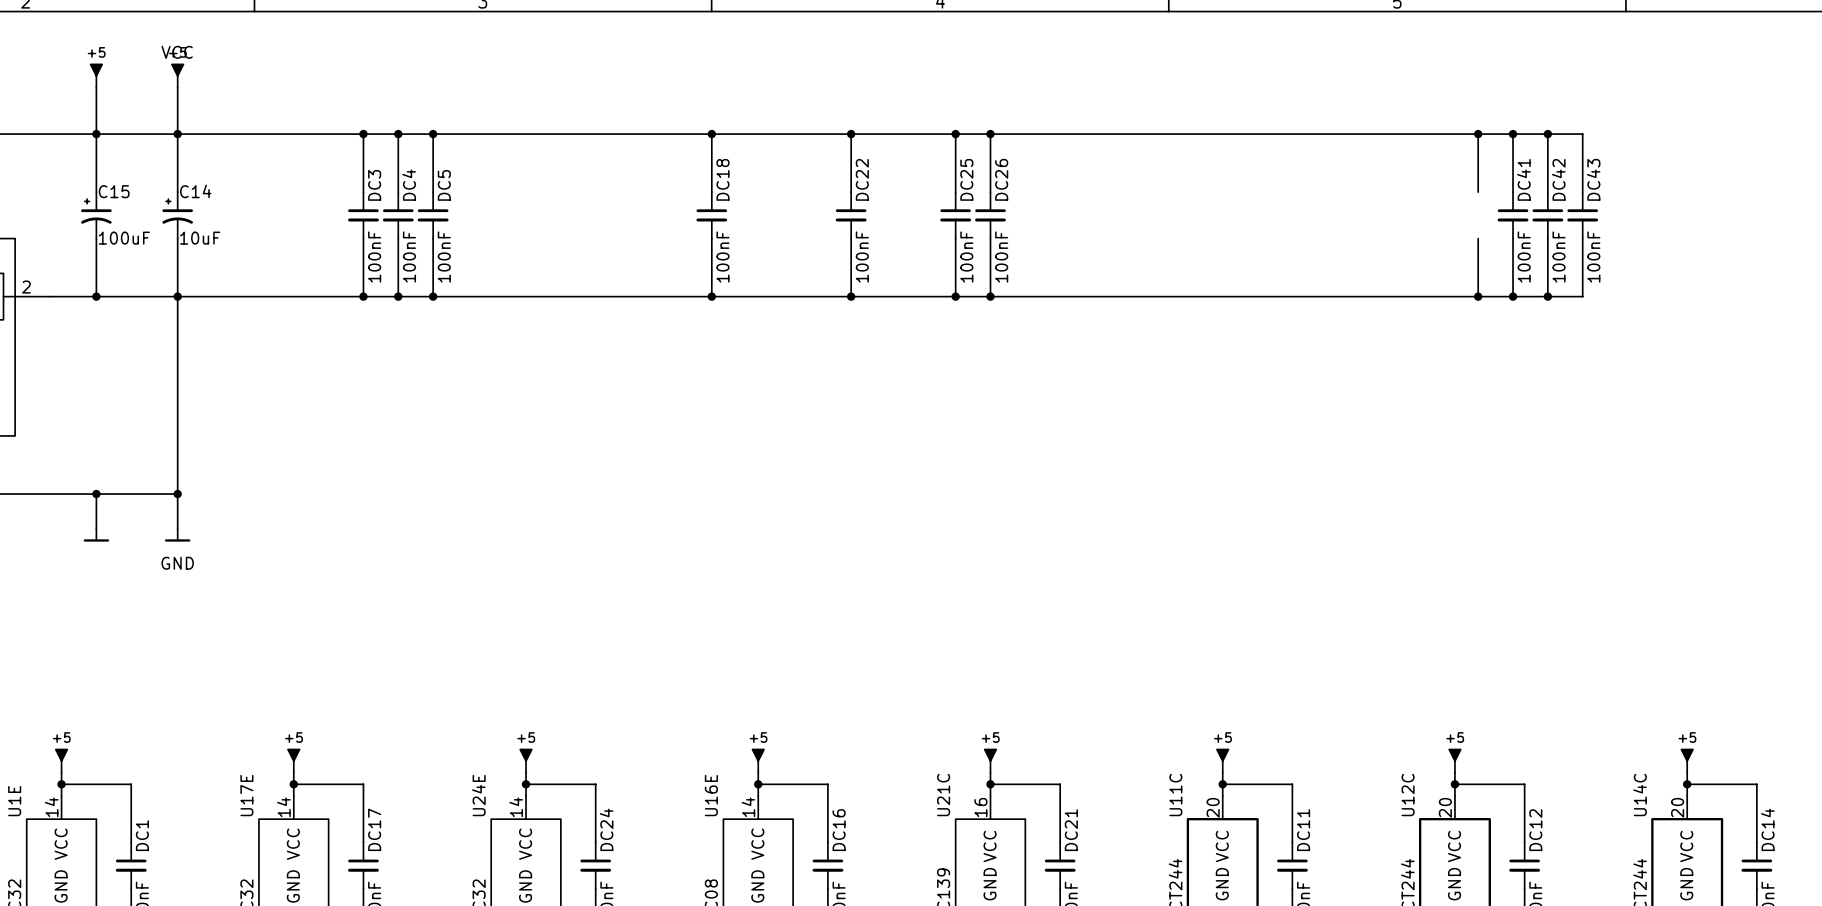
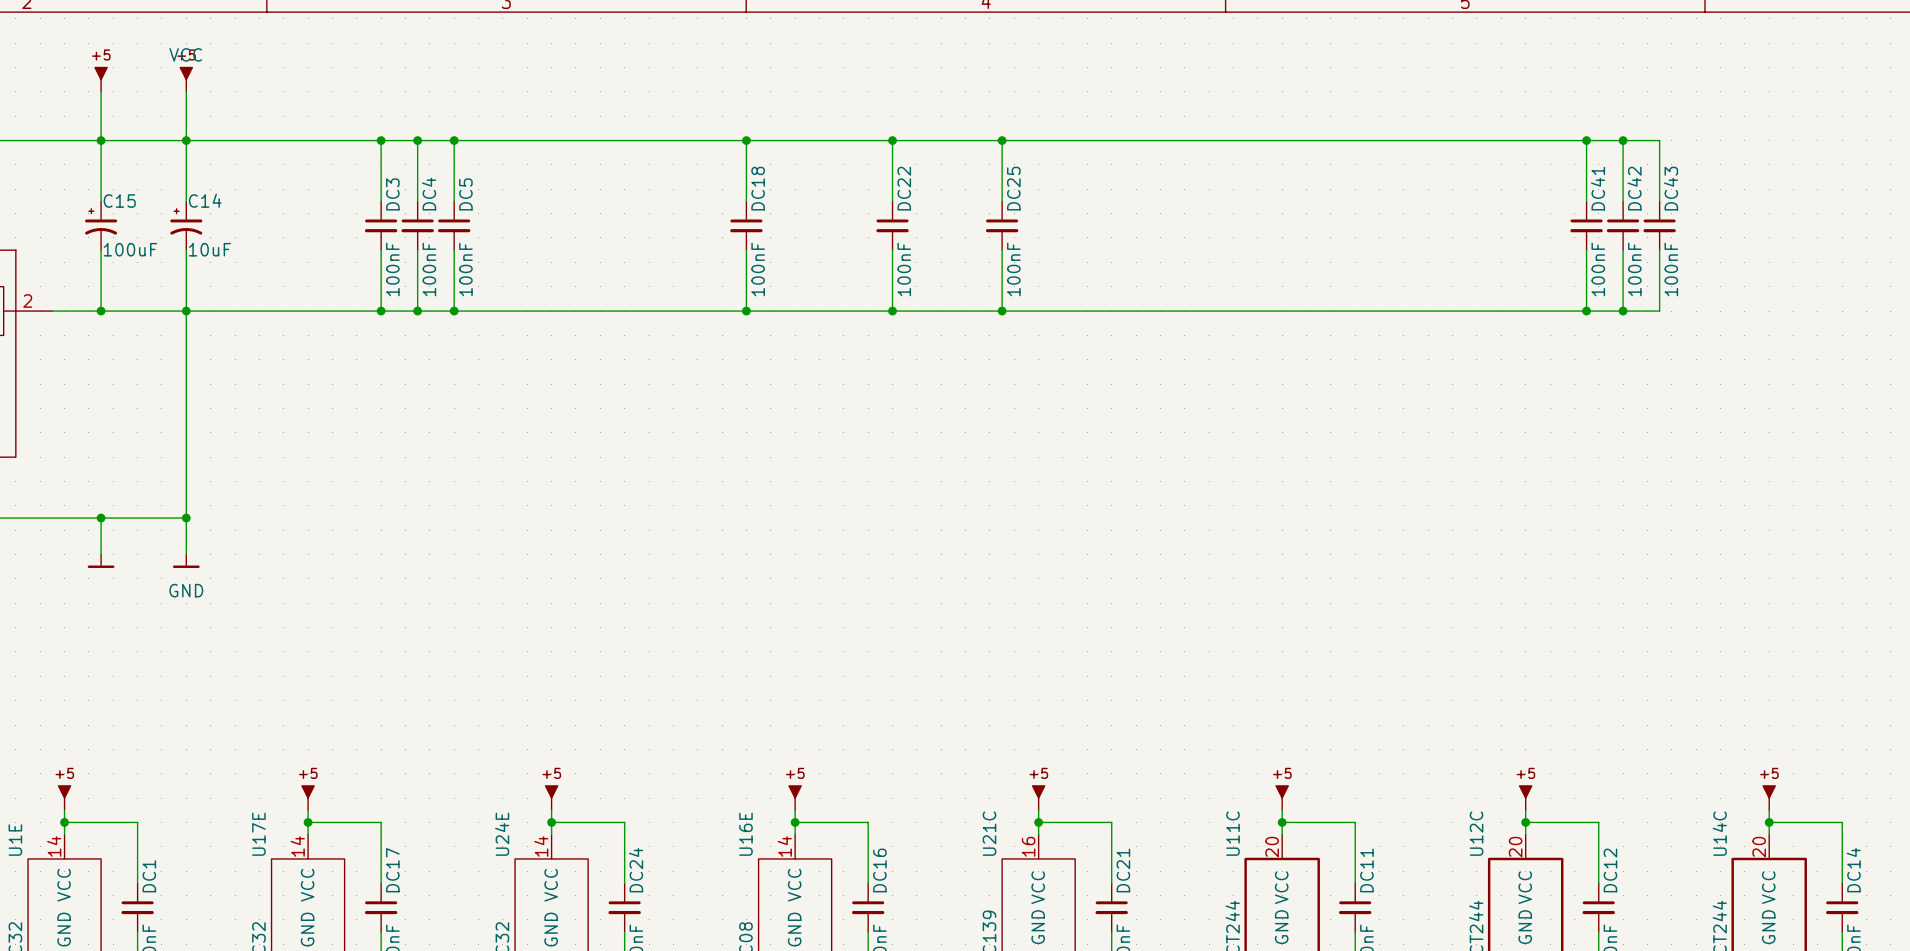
wire: (990, 134) (990, 192) -> none
junction: (990, 134) -> none
wire: (1478, 134) (1478, 192) -> none
junction: (1478, 134) -> none
DC26: 100nF (990, 215) -> none
wire: (990, 238) (990, 296) -> none
wire: (1478, 238) (1478, 296) -> none
junction: (990, 296) -> none
junction: (1478, 296) -> none

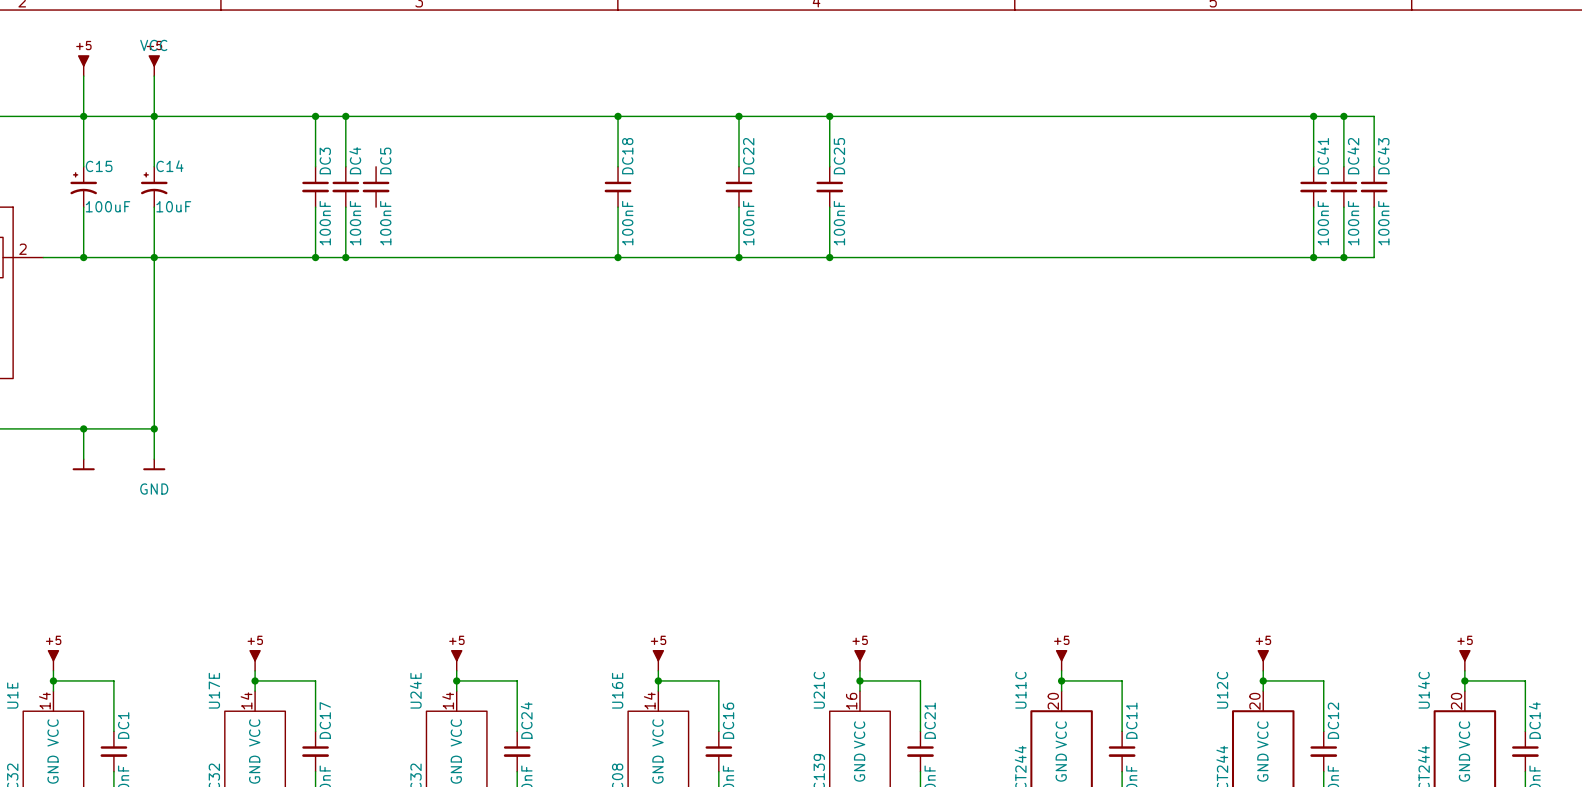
wire: (454, 140) (454, 201) -> none
junction: (454, 140) -> none
wire: (454, 250) (454, 311) -> none
junction: (454, 311) -> none

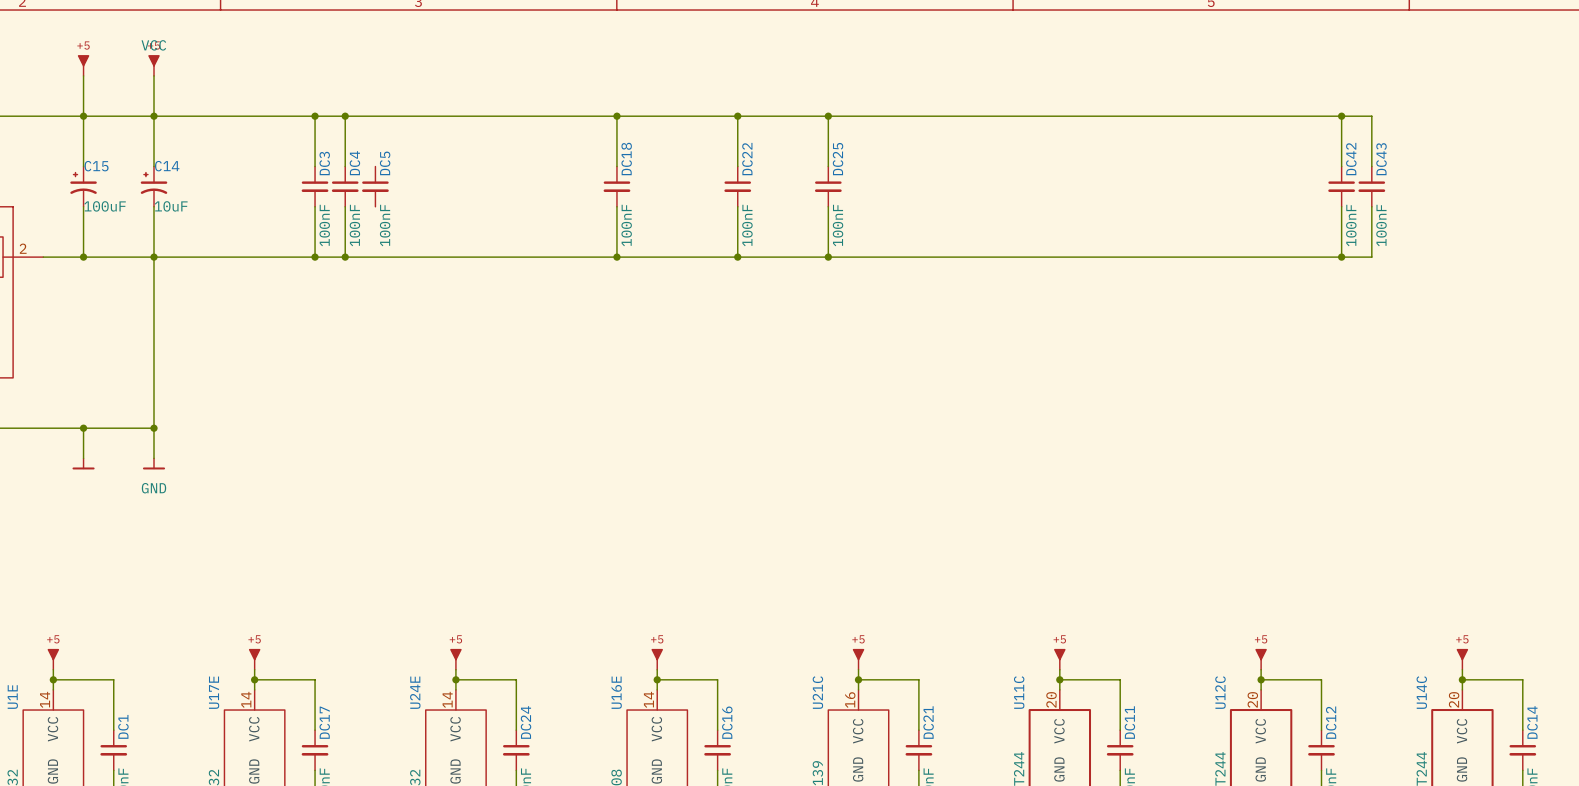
wire: (1313, 116) (1313, 166) -> none
junction: (1313, 116) -> none
DC41: 100nF (1313, 186) -> none
wire: (1313, 207) (1313, 257) -> none
junction: (1313, 257) -> none

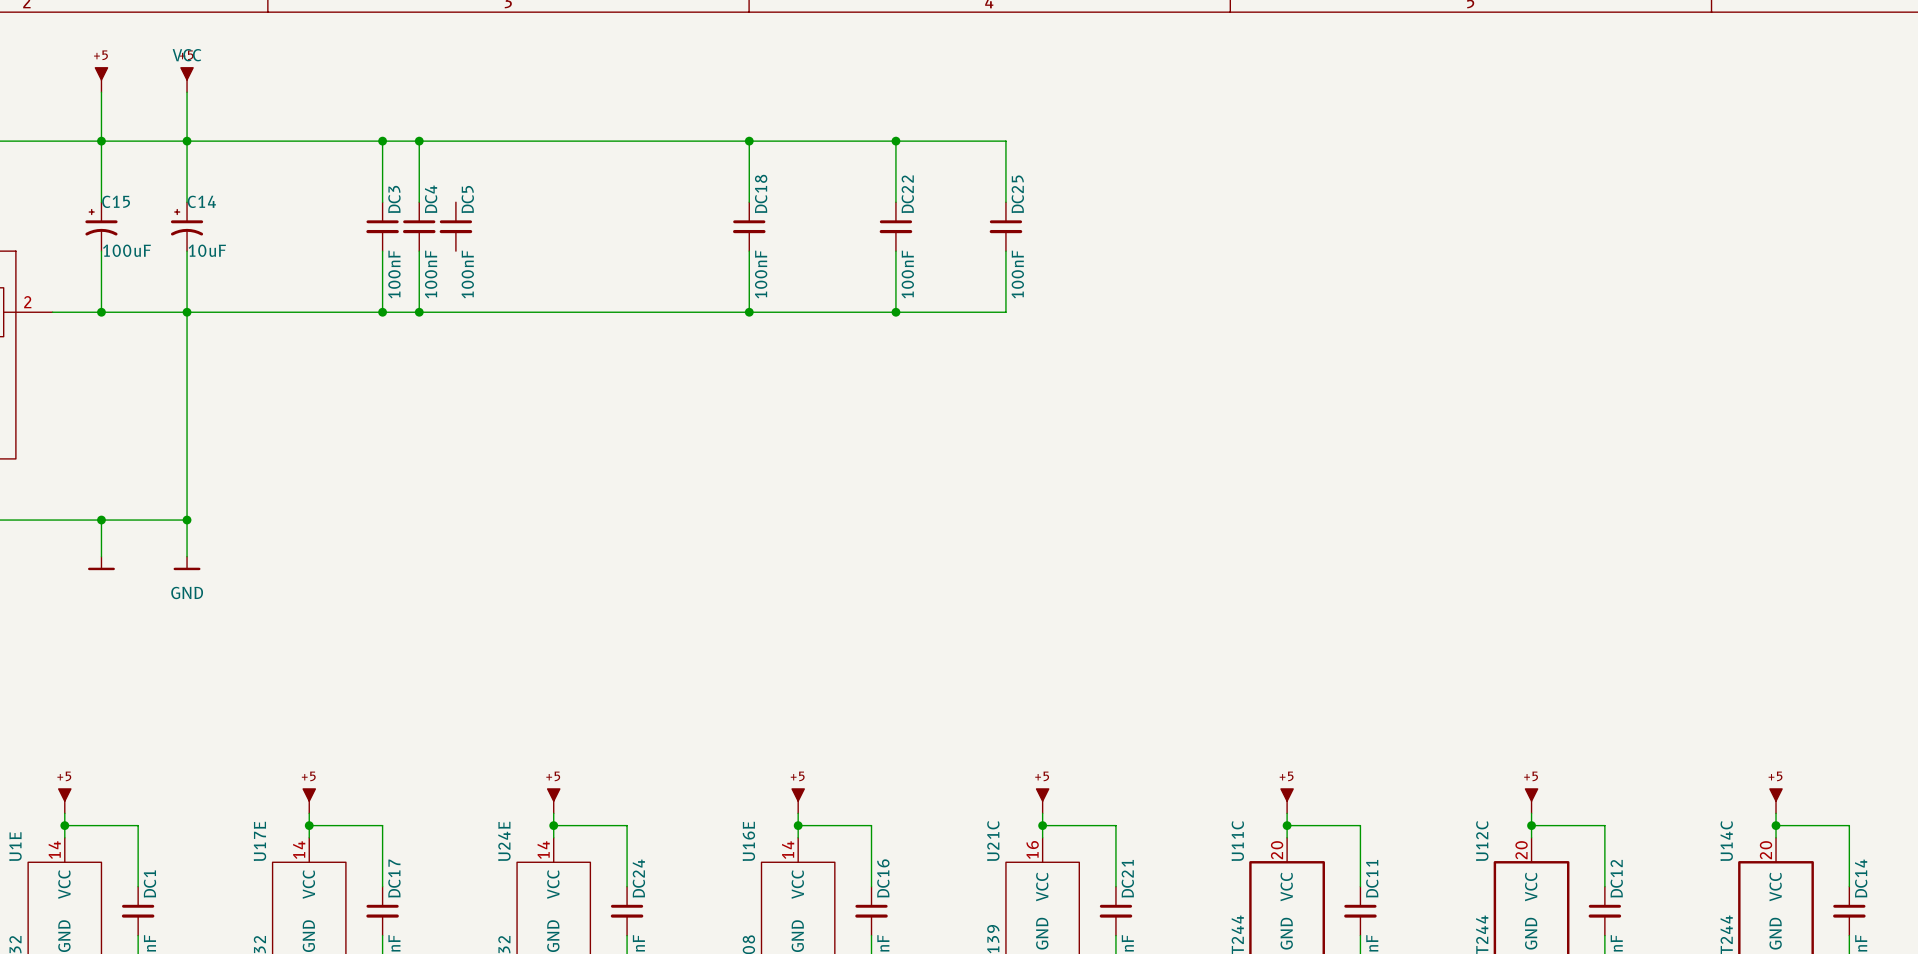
wire: (828, 116) (1371, 116) (1371, 166) -> none
junction: (828, 116) -> none
wire: (1341, 116) (1341, 166) -> none
junction: (1341, 116) -> none
DC42: 100nF (1341, 186) -> none
DC43: 100nF (1371, 186) -> none
wire: (1341, 206) (1341, 257) -> none
wire: (1371, 206) (1371, 257) (828, 257) -> none
junction: (828, 257) -> none
junction: (1341, 257) -> none

